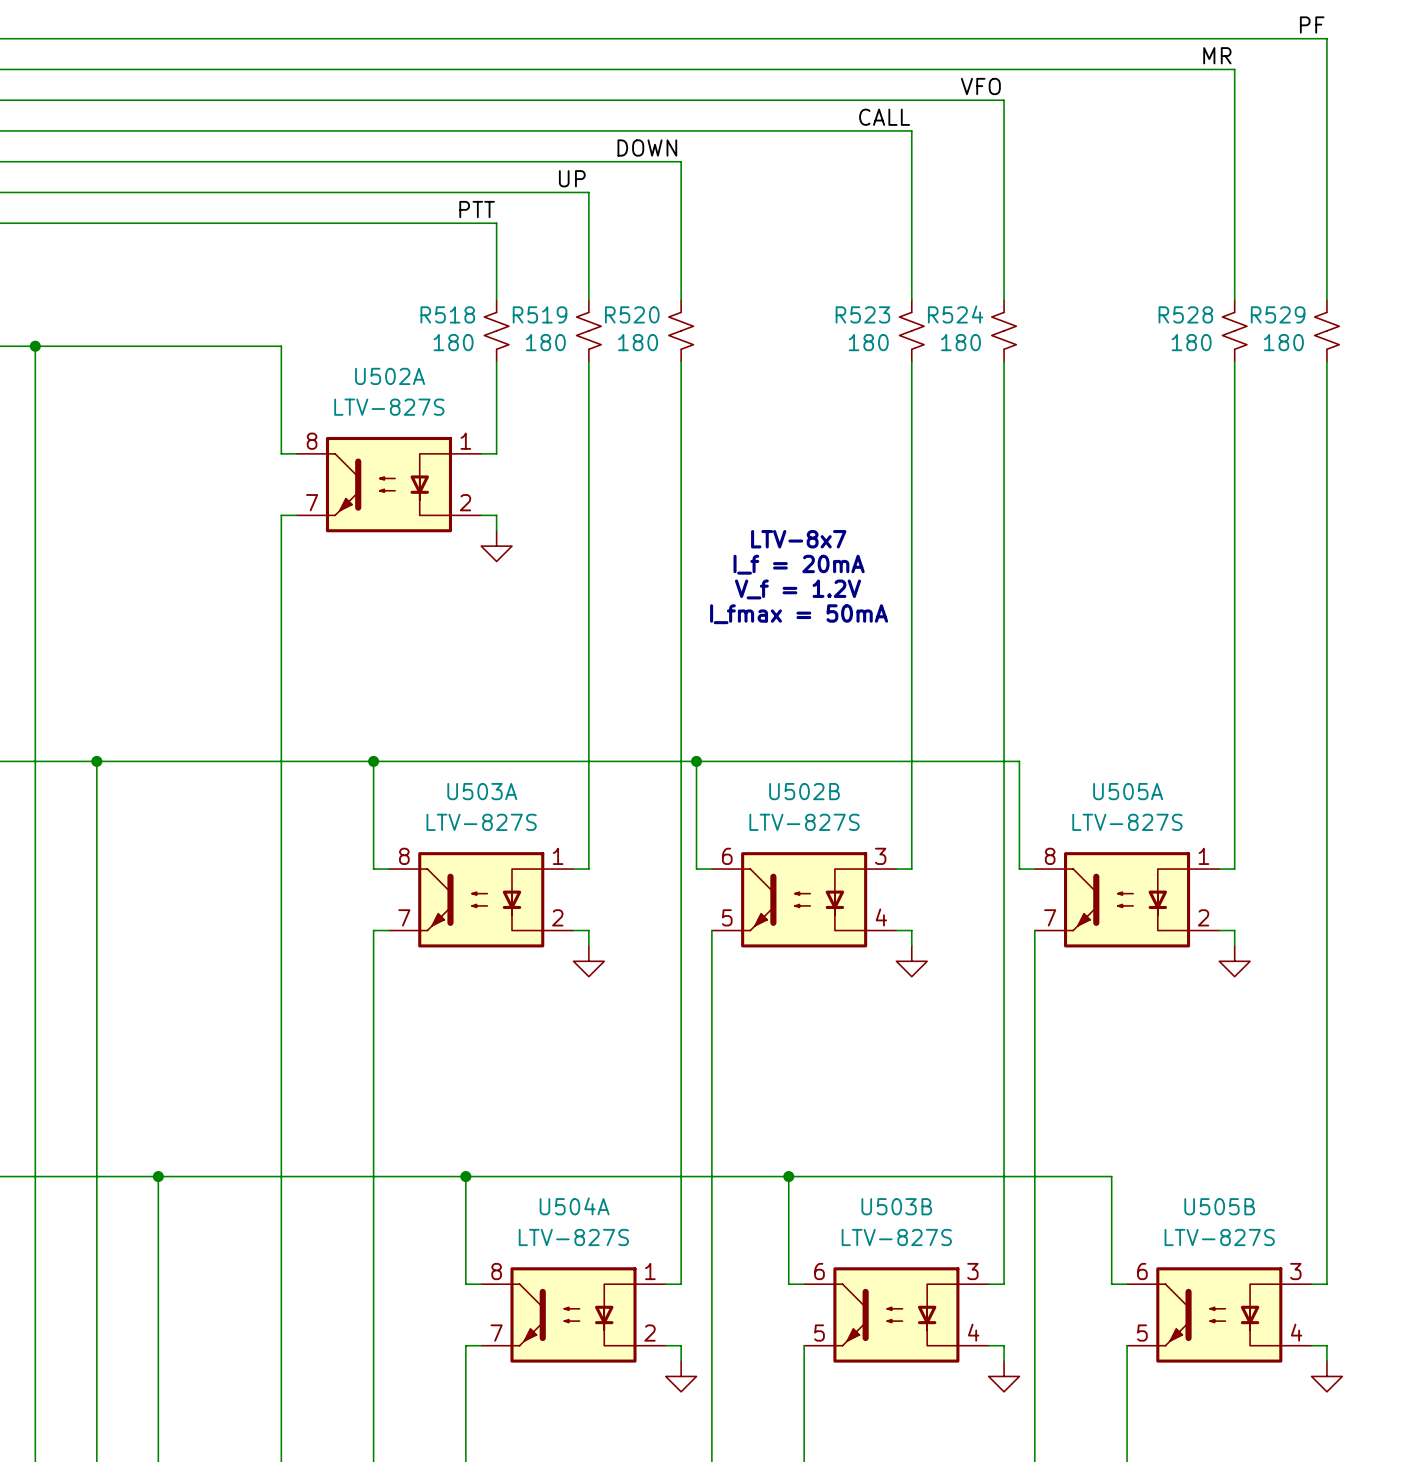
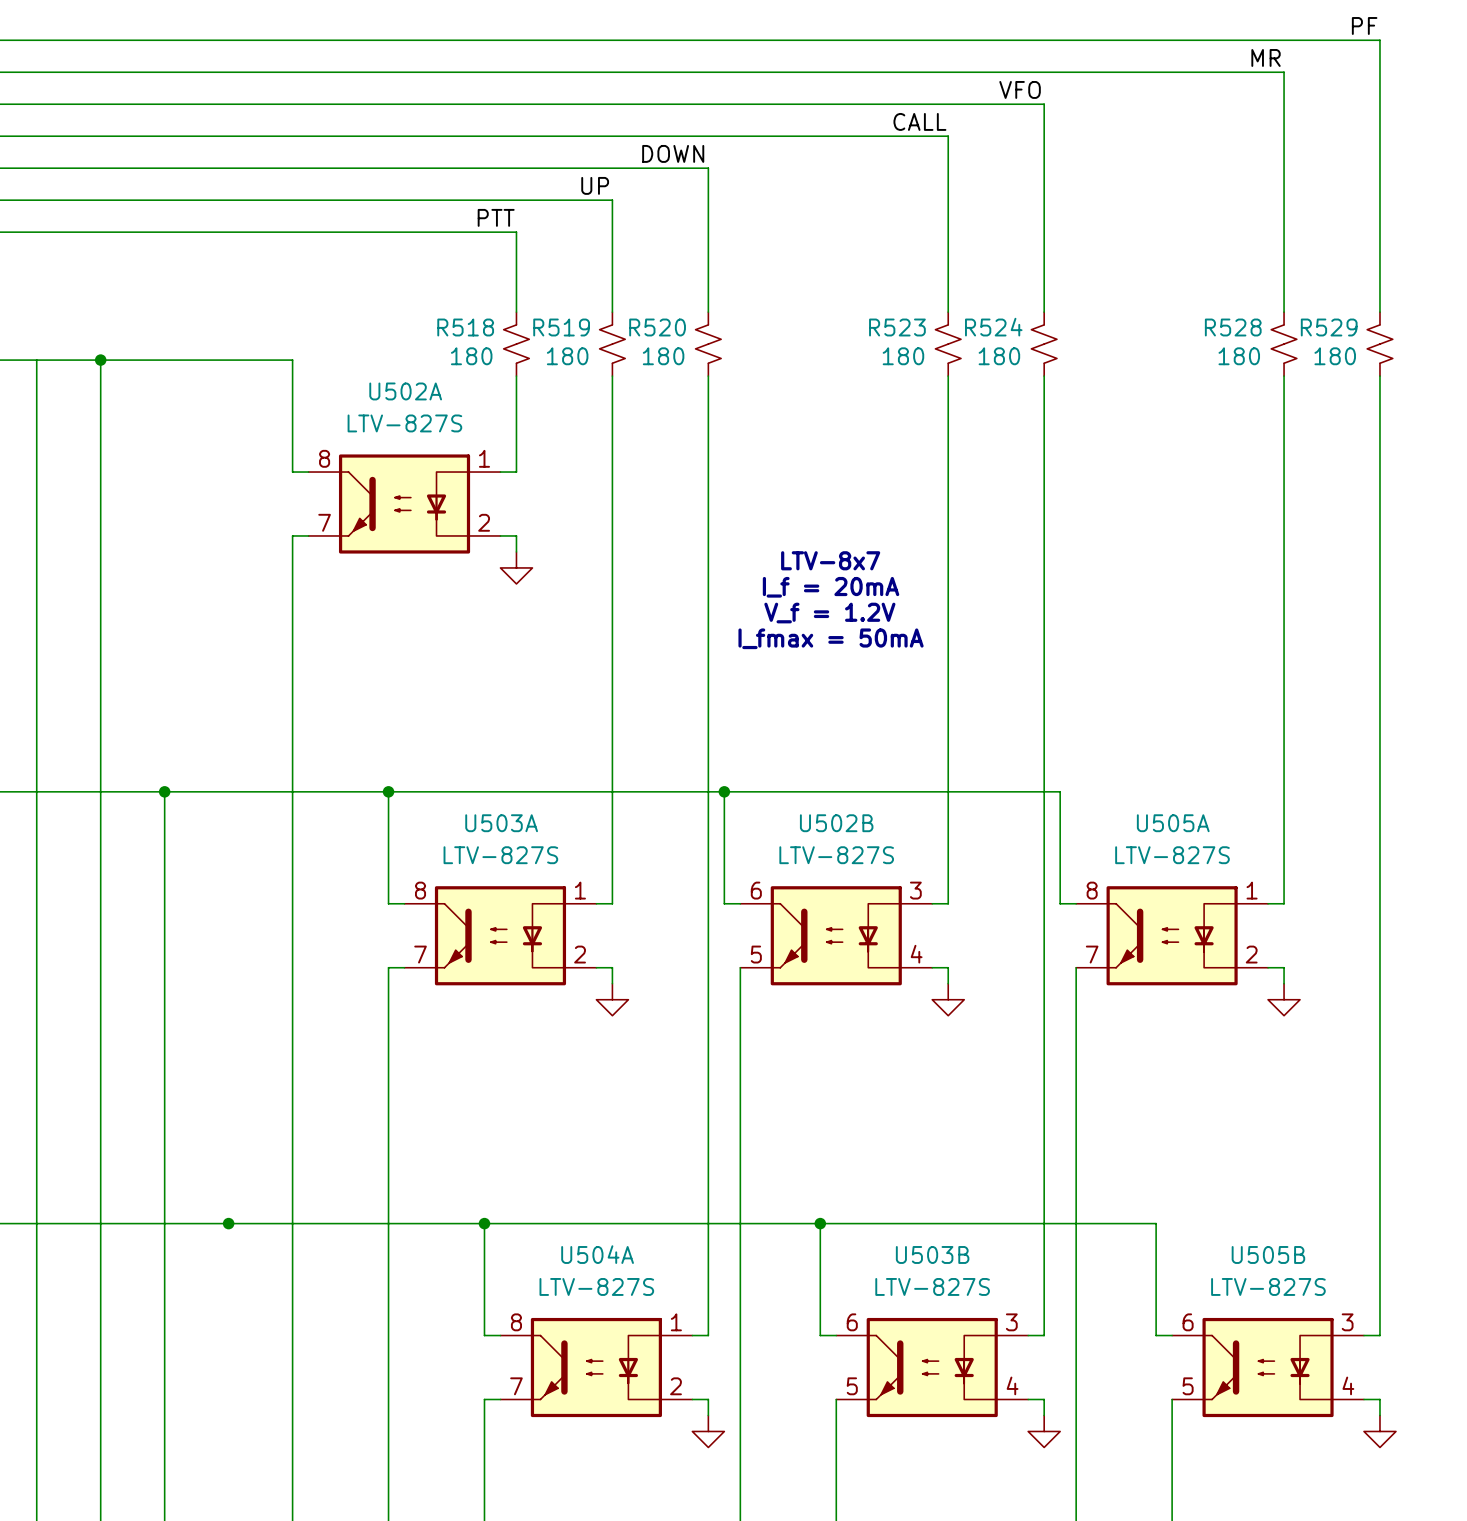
junction position: (35, 346) -> (100, 360)
wire: none -> (100, 360) (100, 791)
junction position: (96, 761) -> (164, 791)
wire: none -> (164, 791) (164, 1223)
junction position: (158, 1176) -> (228, 1223)

